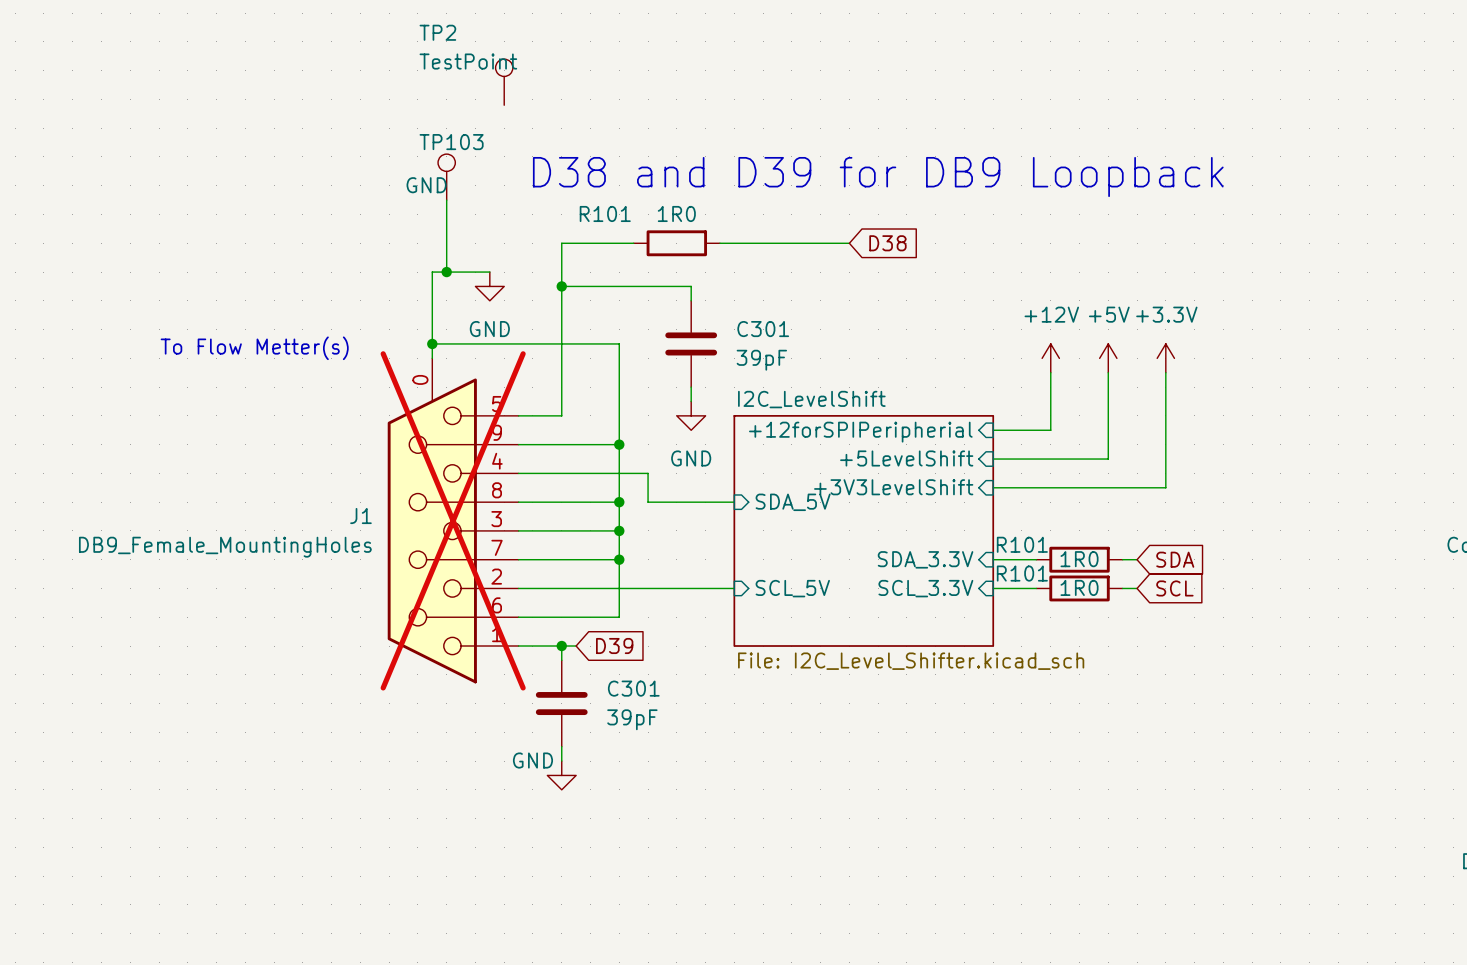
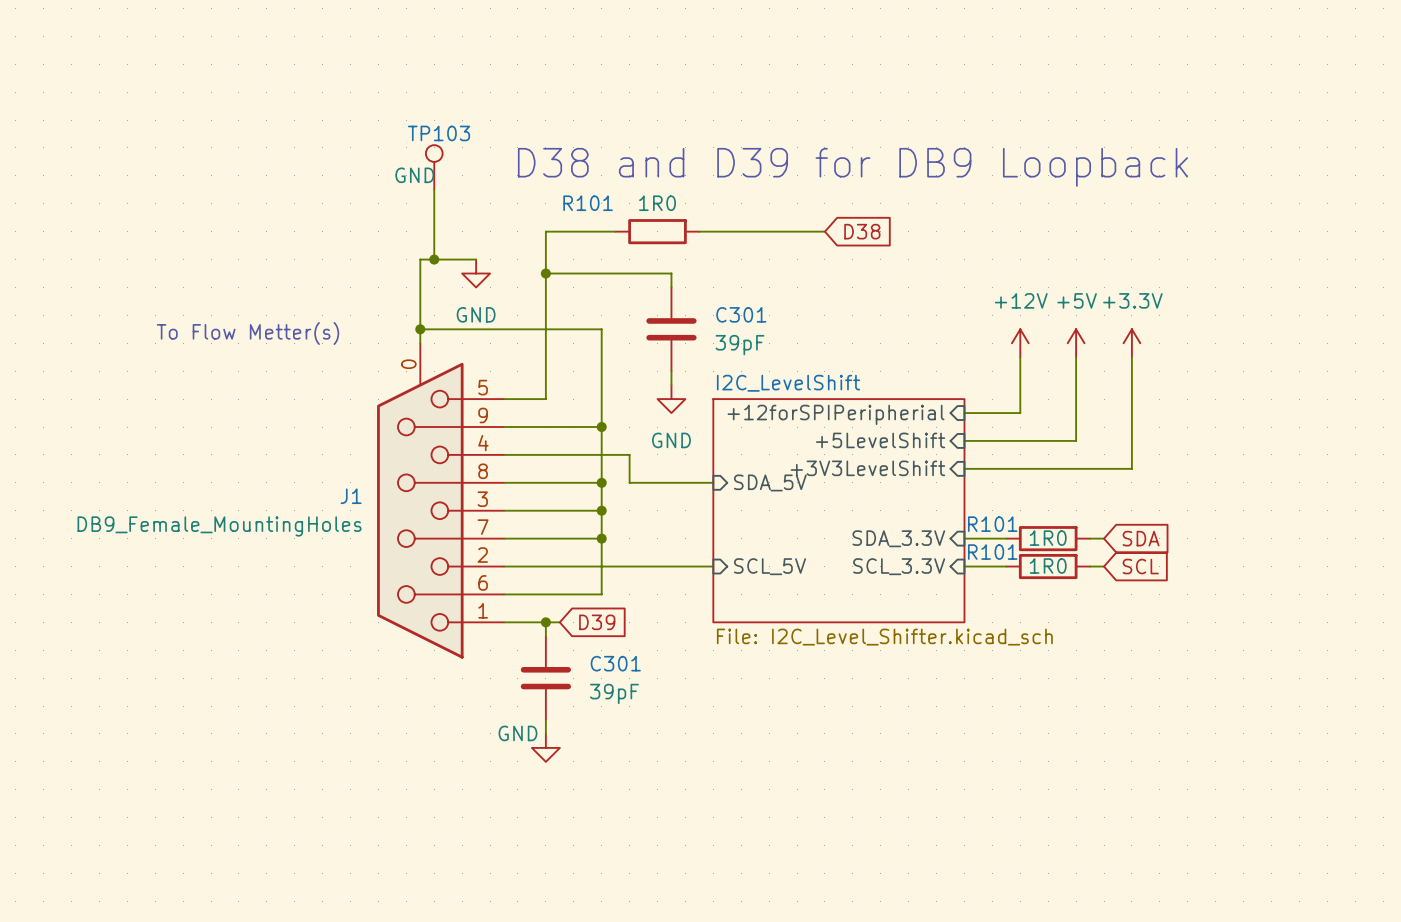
TP2: TestPoint (504, 82) -> none
J1 do-not-place cross: (453, 520) -> none

